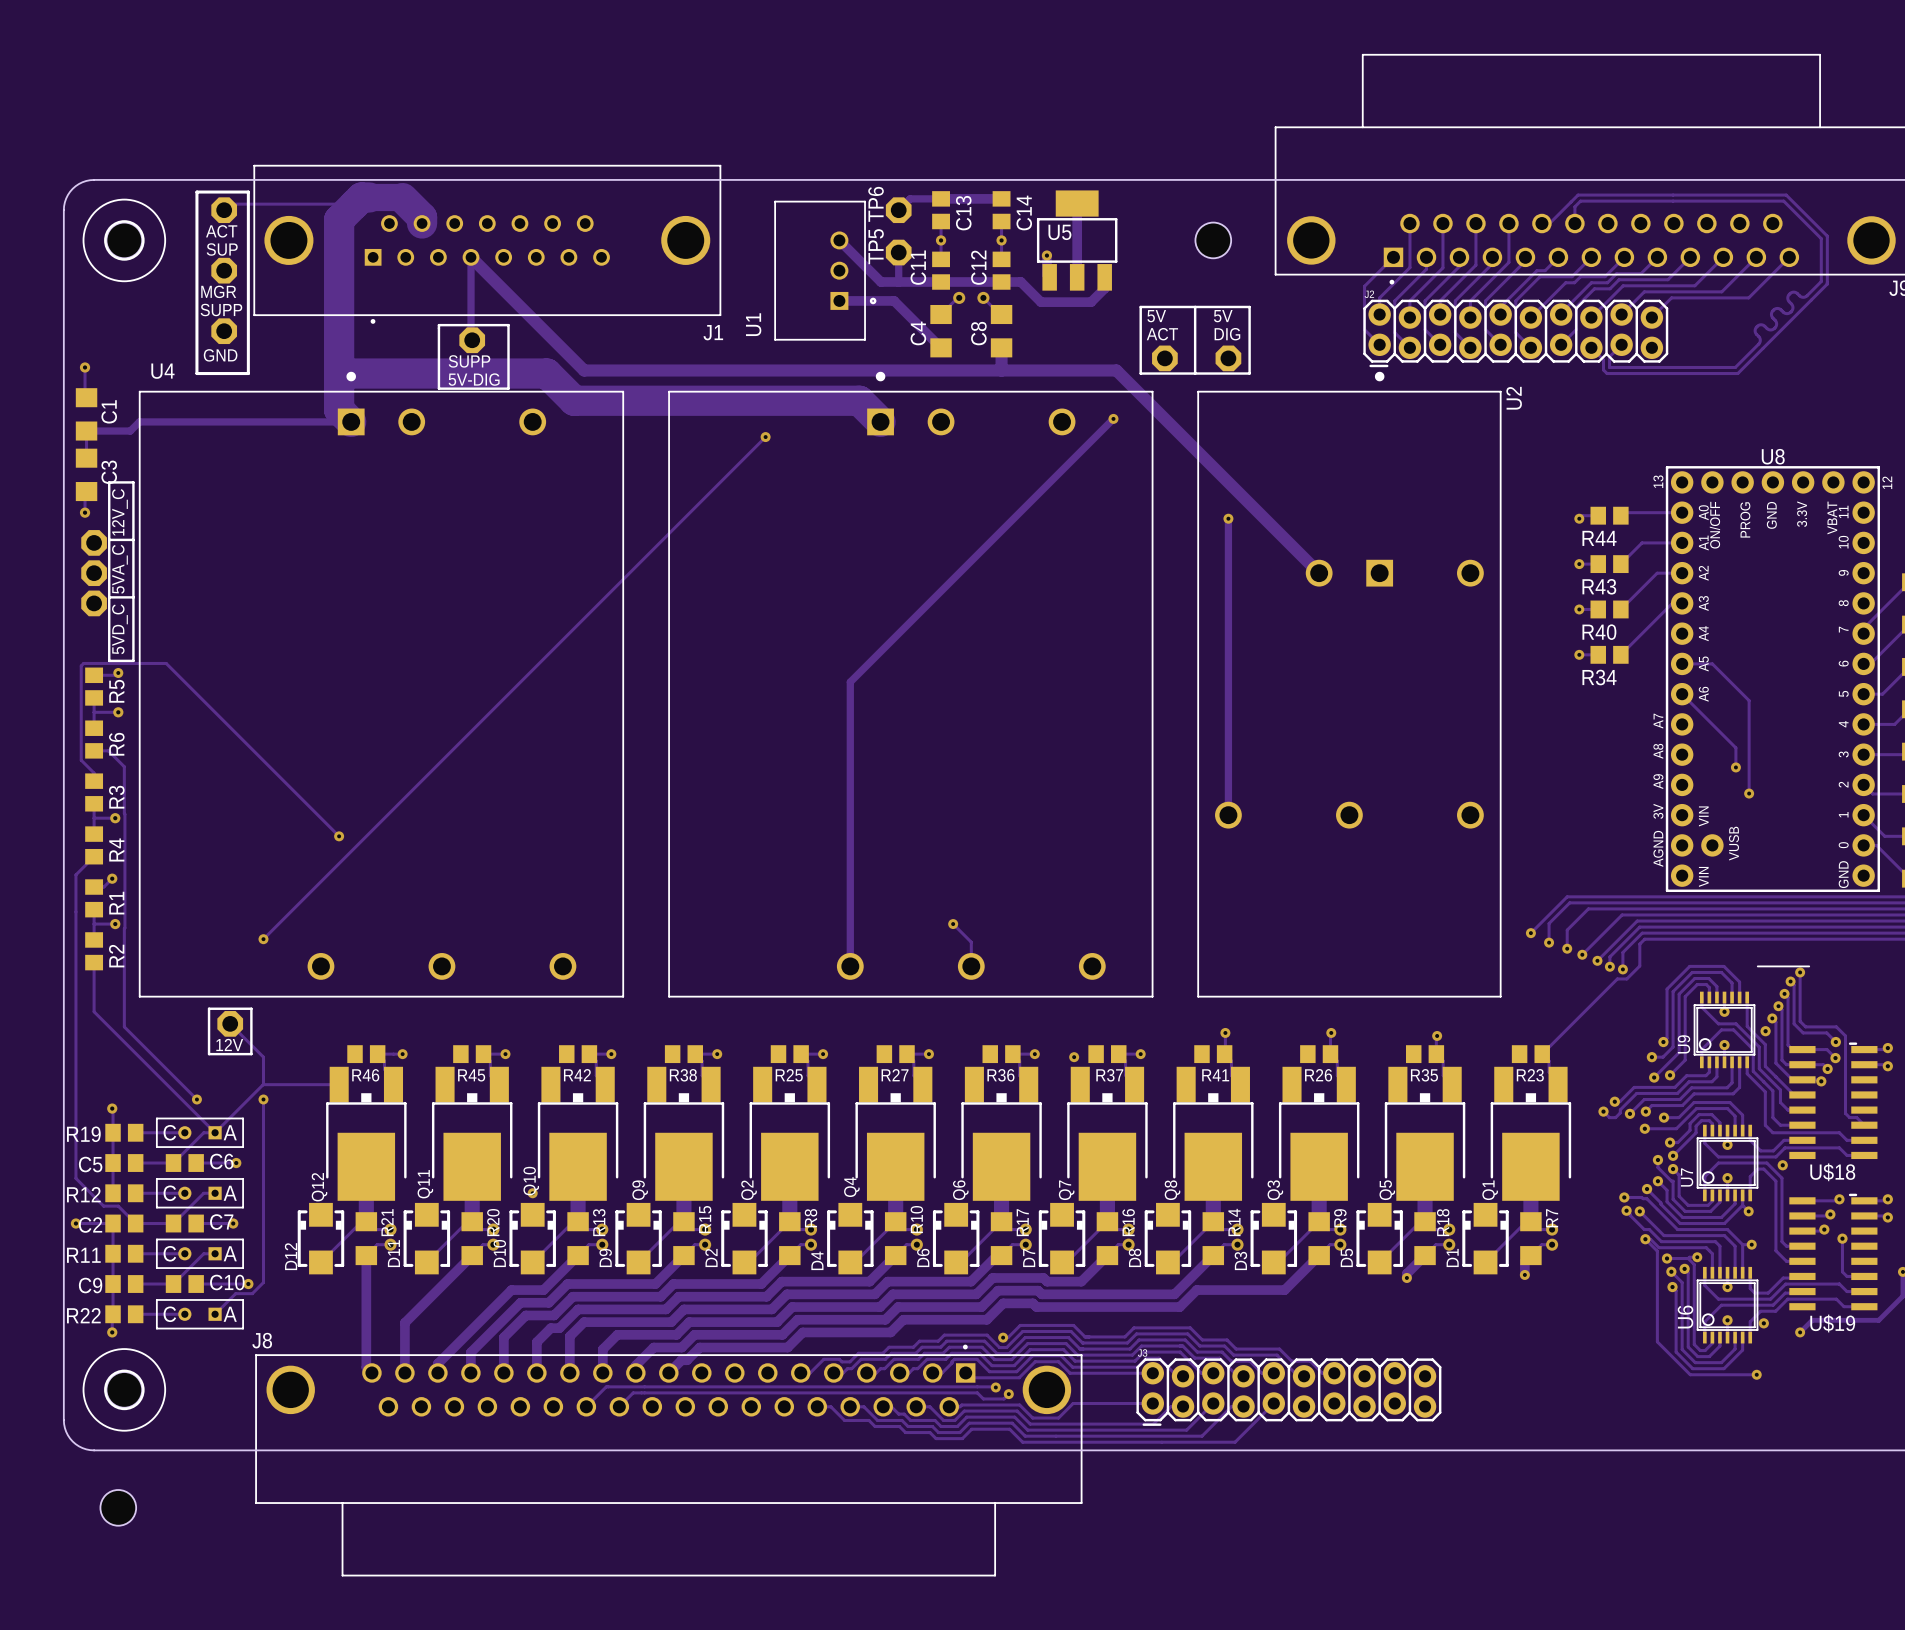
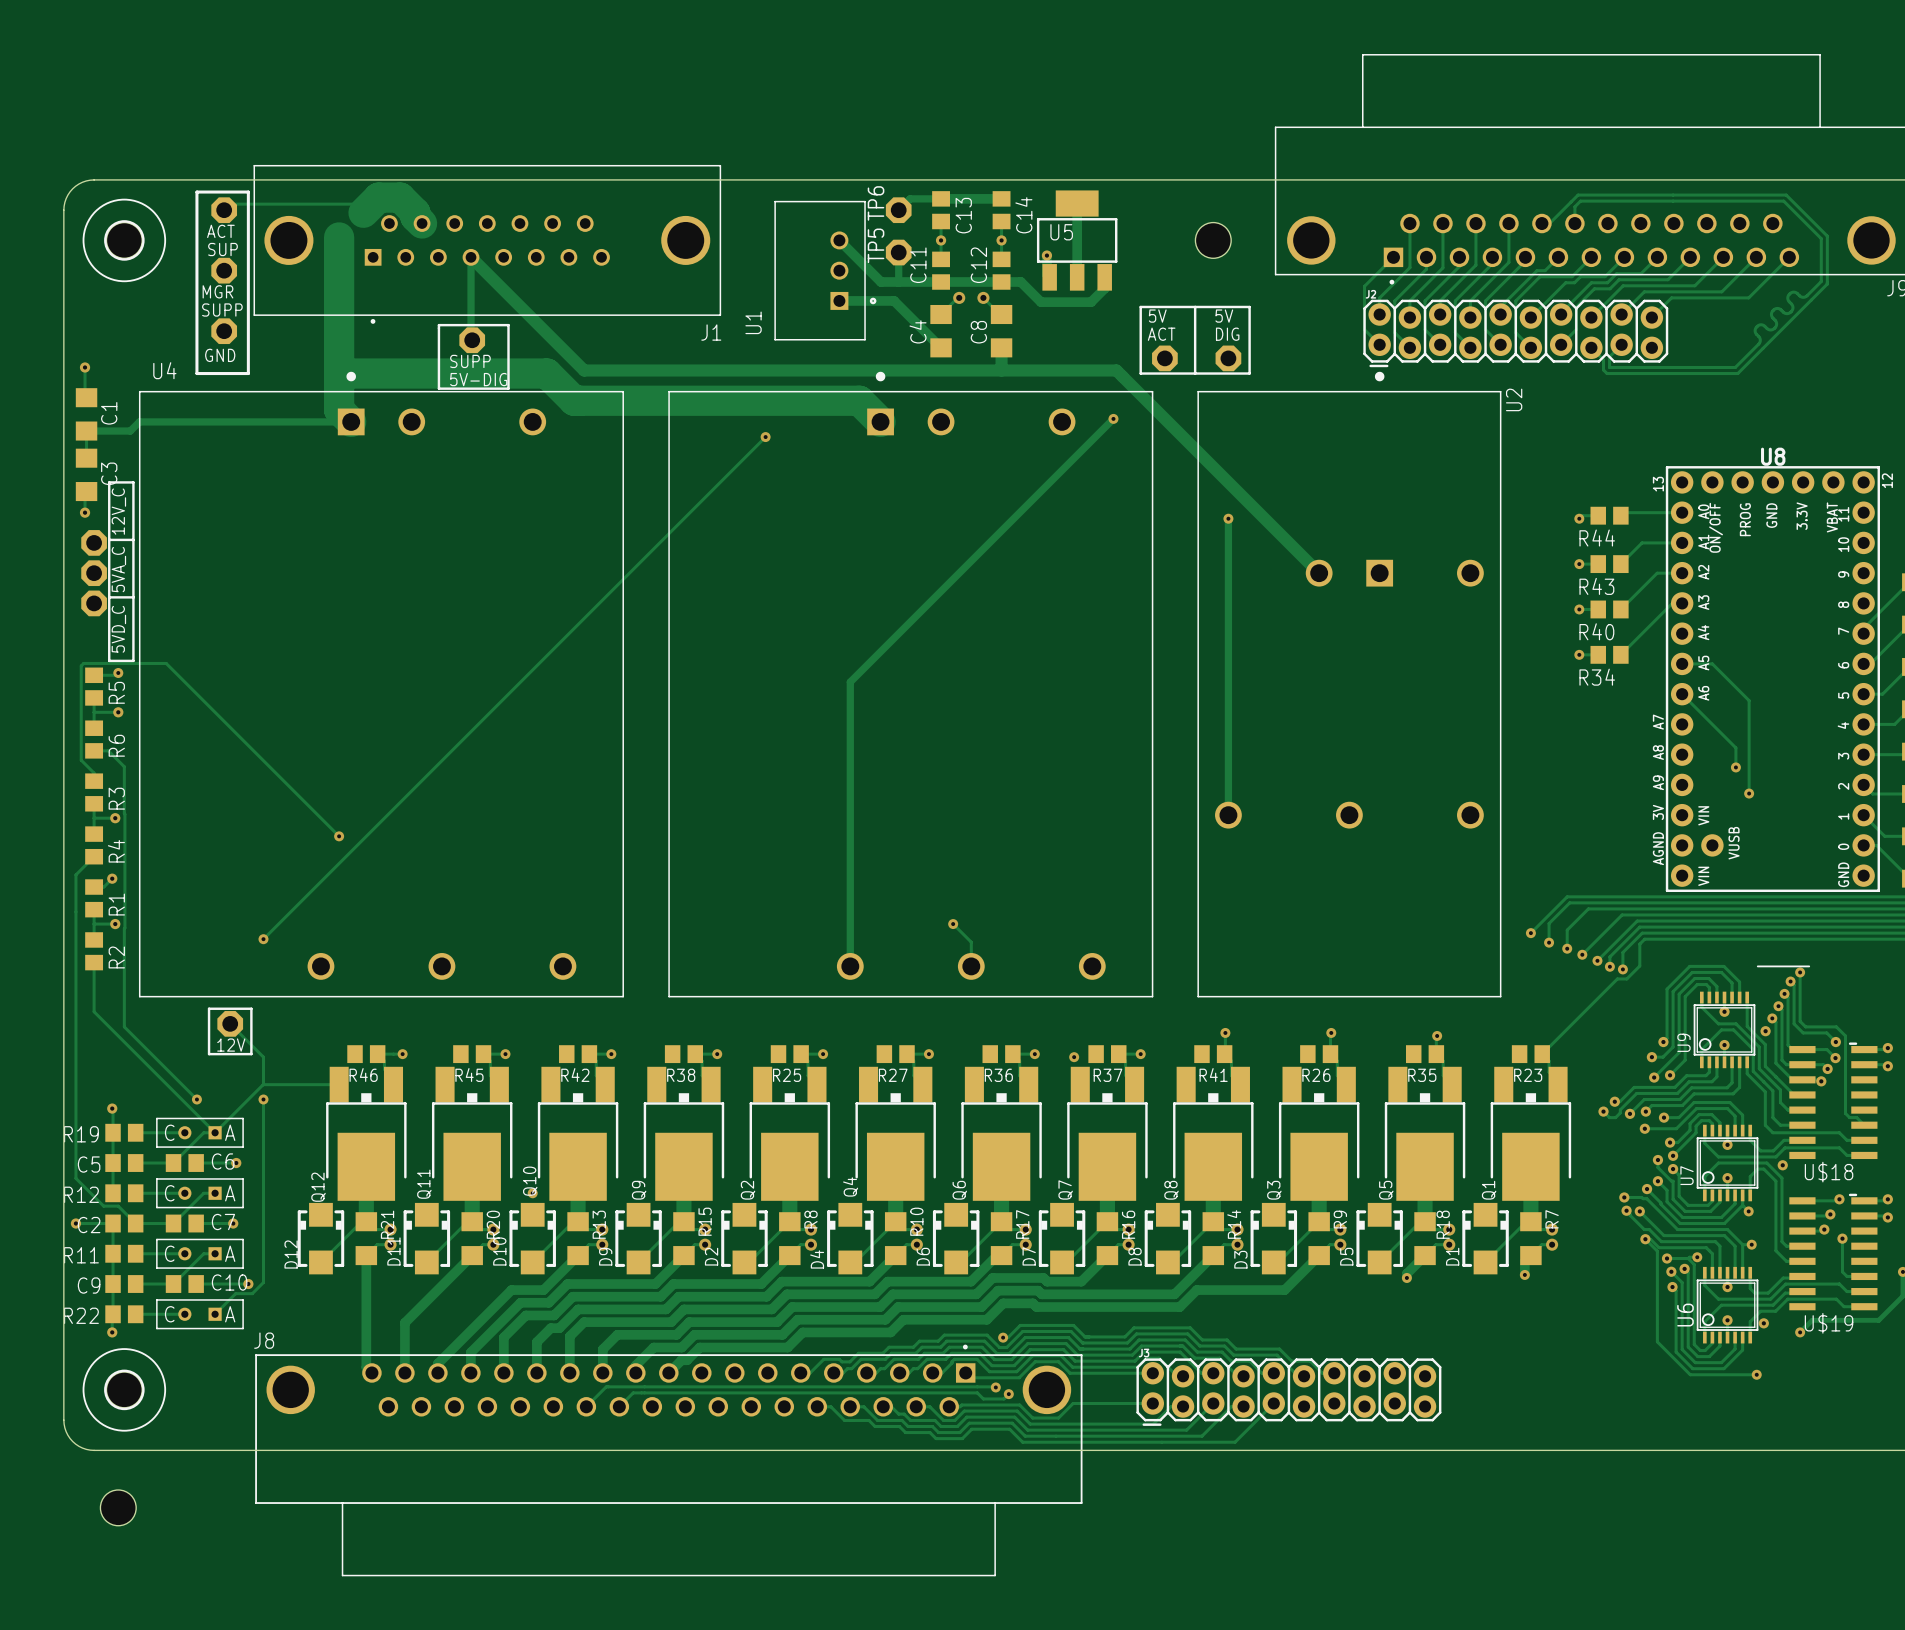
track: (422, 223) (422, 217) (402, 197) (361, 197) (339, 219) (339, 237) -> (422, 223) (415, 216) (415, 212) (400, 197) (378, 197) (363, 212) (354, 204)

